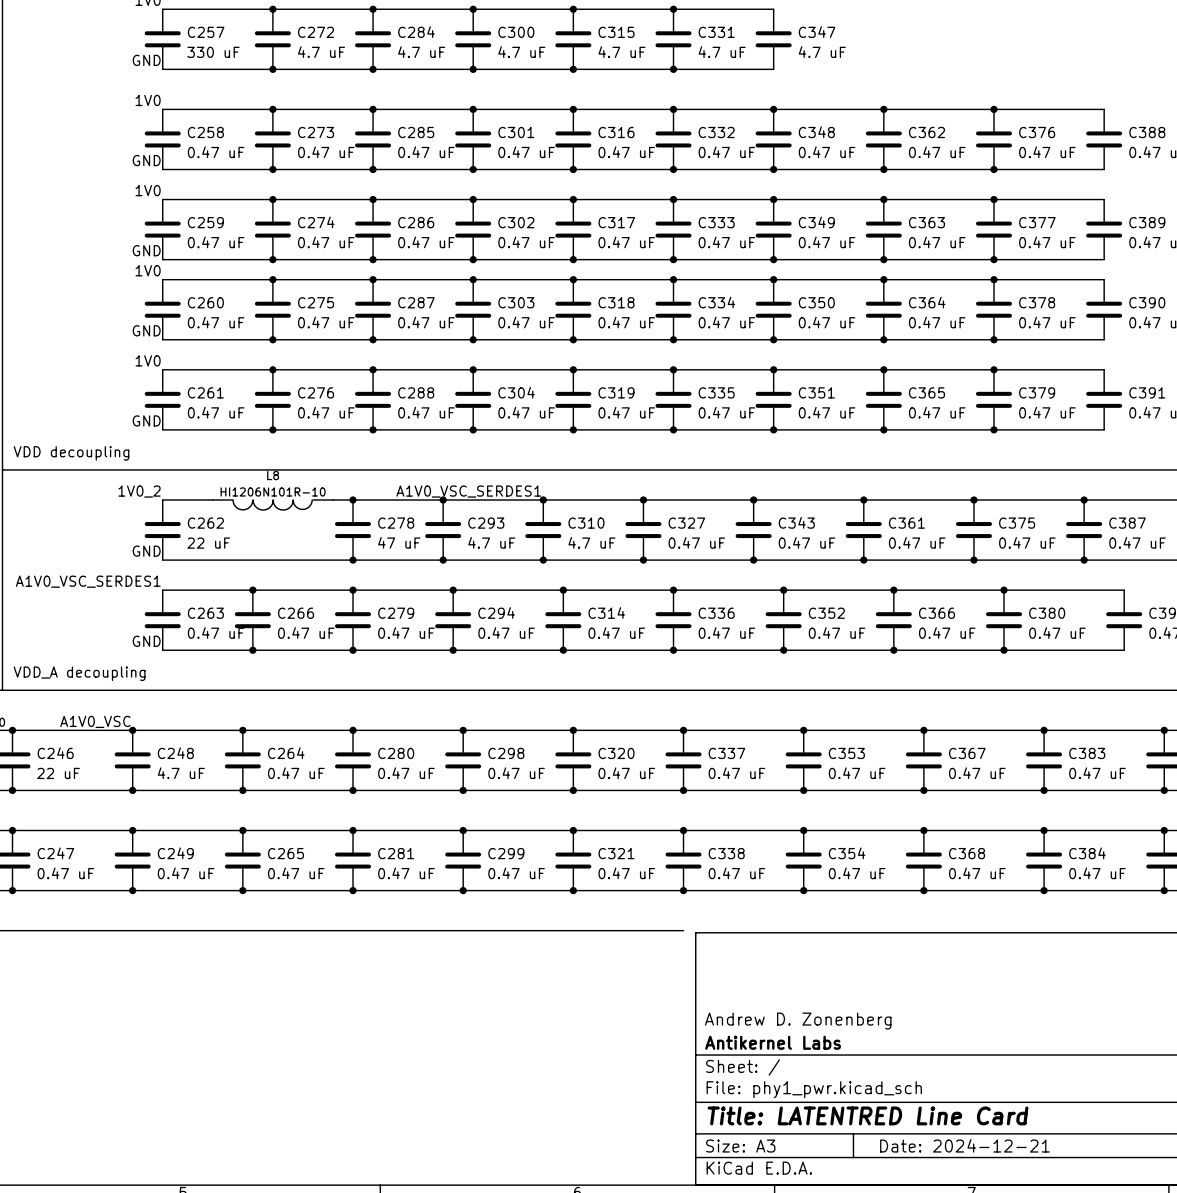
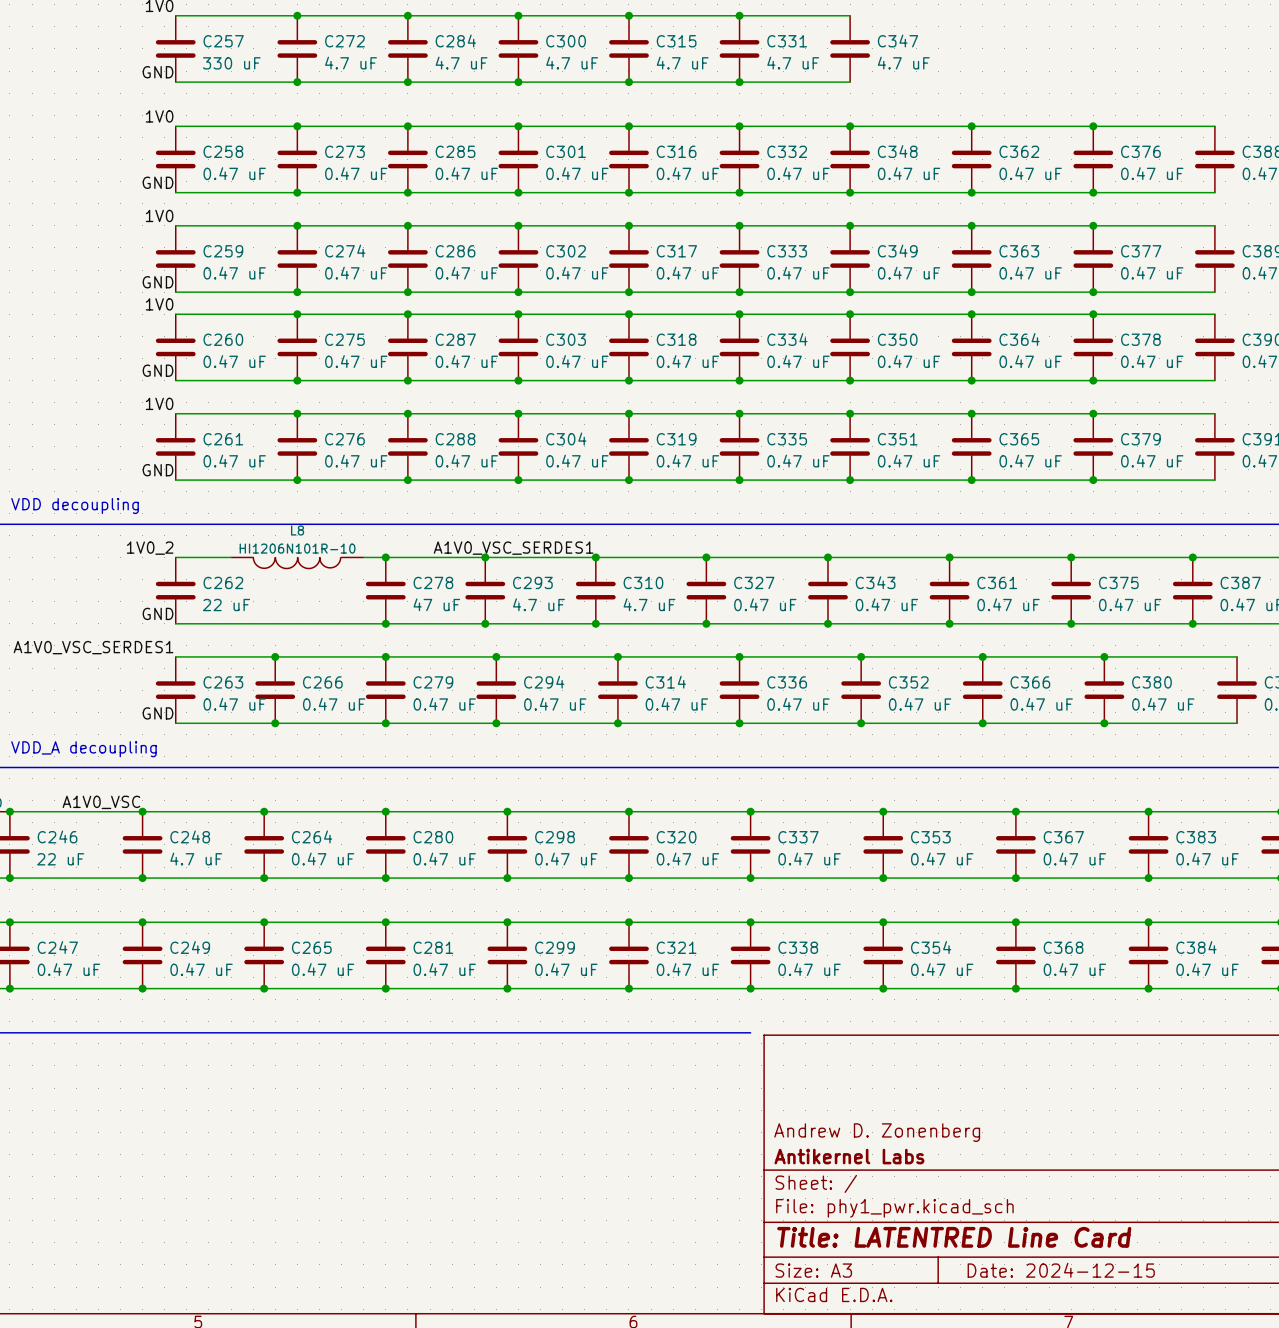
title block: Date: 2024-12-21 (964, 1145) -> Date: 2024-12-15 (1061, 1270)

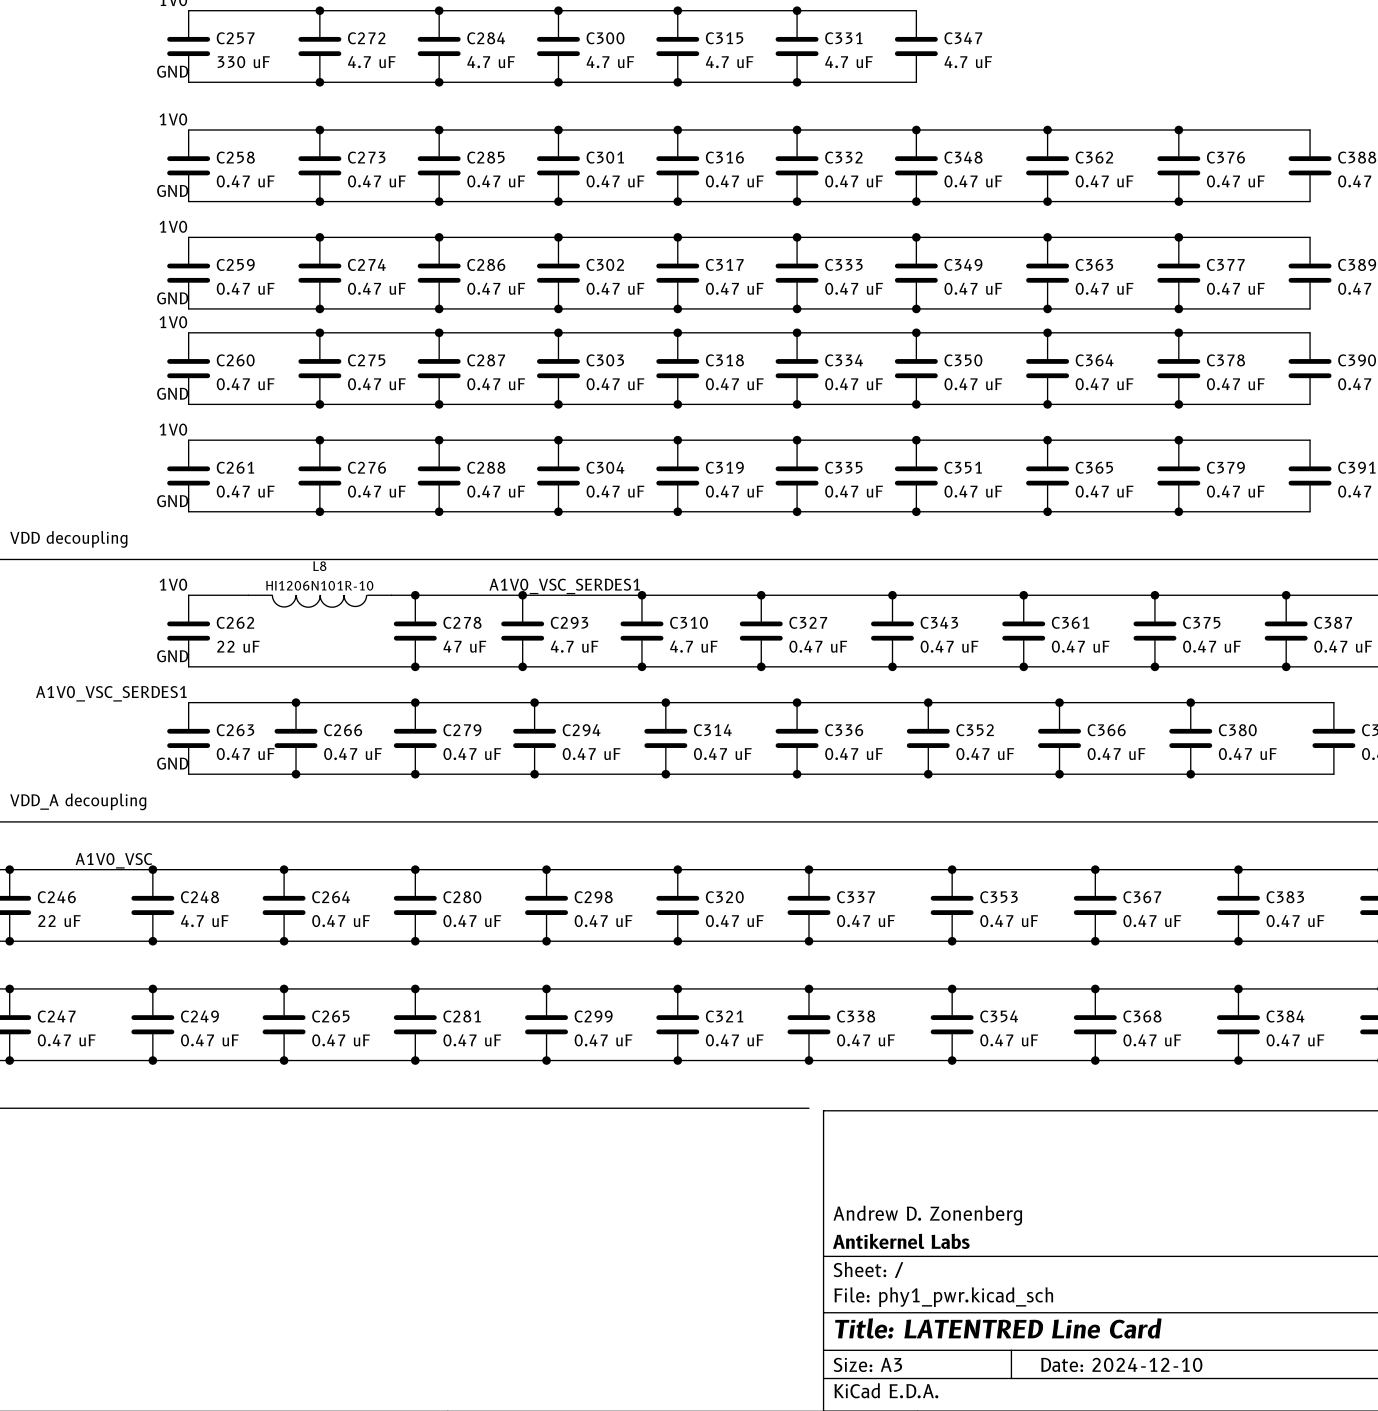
label: 1V0_2 (150, 548) -> 1V0 (173, 584)
title block: Date: 2024-12-15 (1061, 1270) -> Date: 2024-12-10 (1121, 1364)

